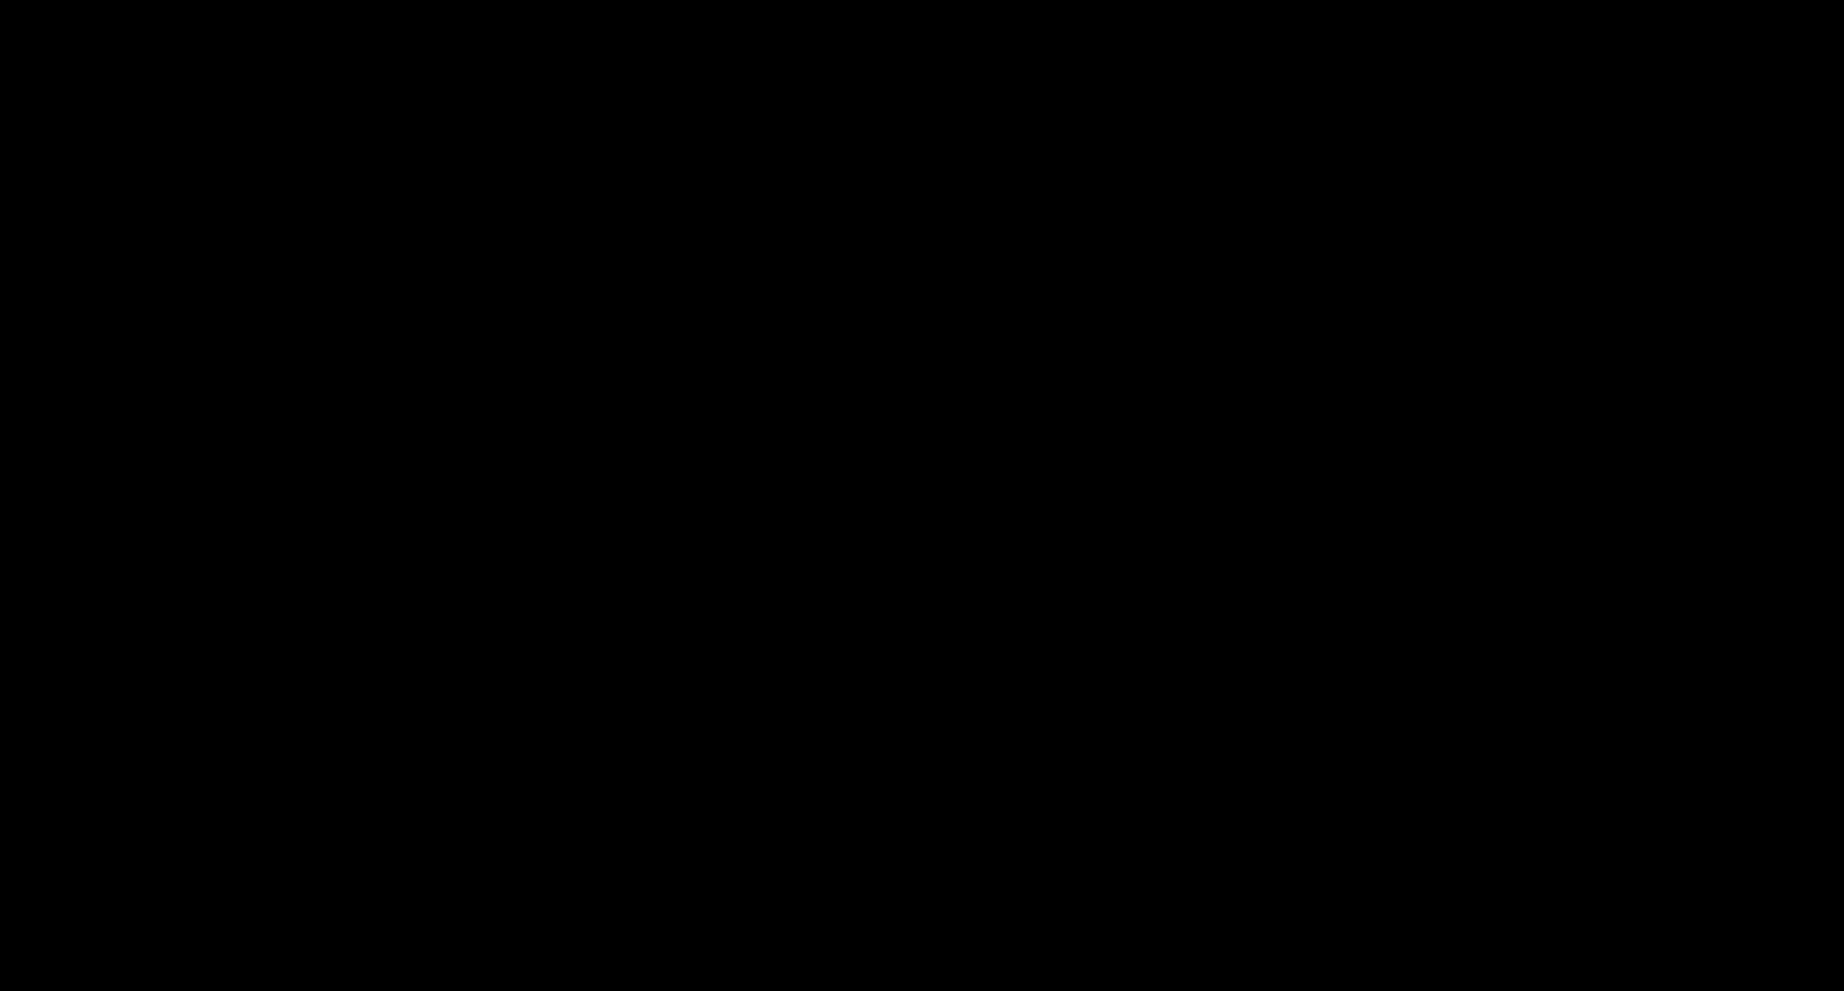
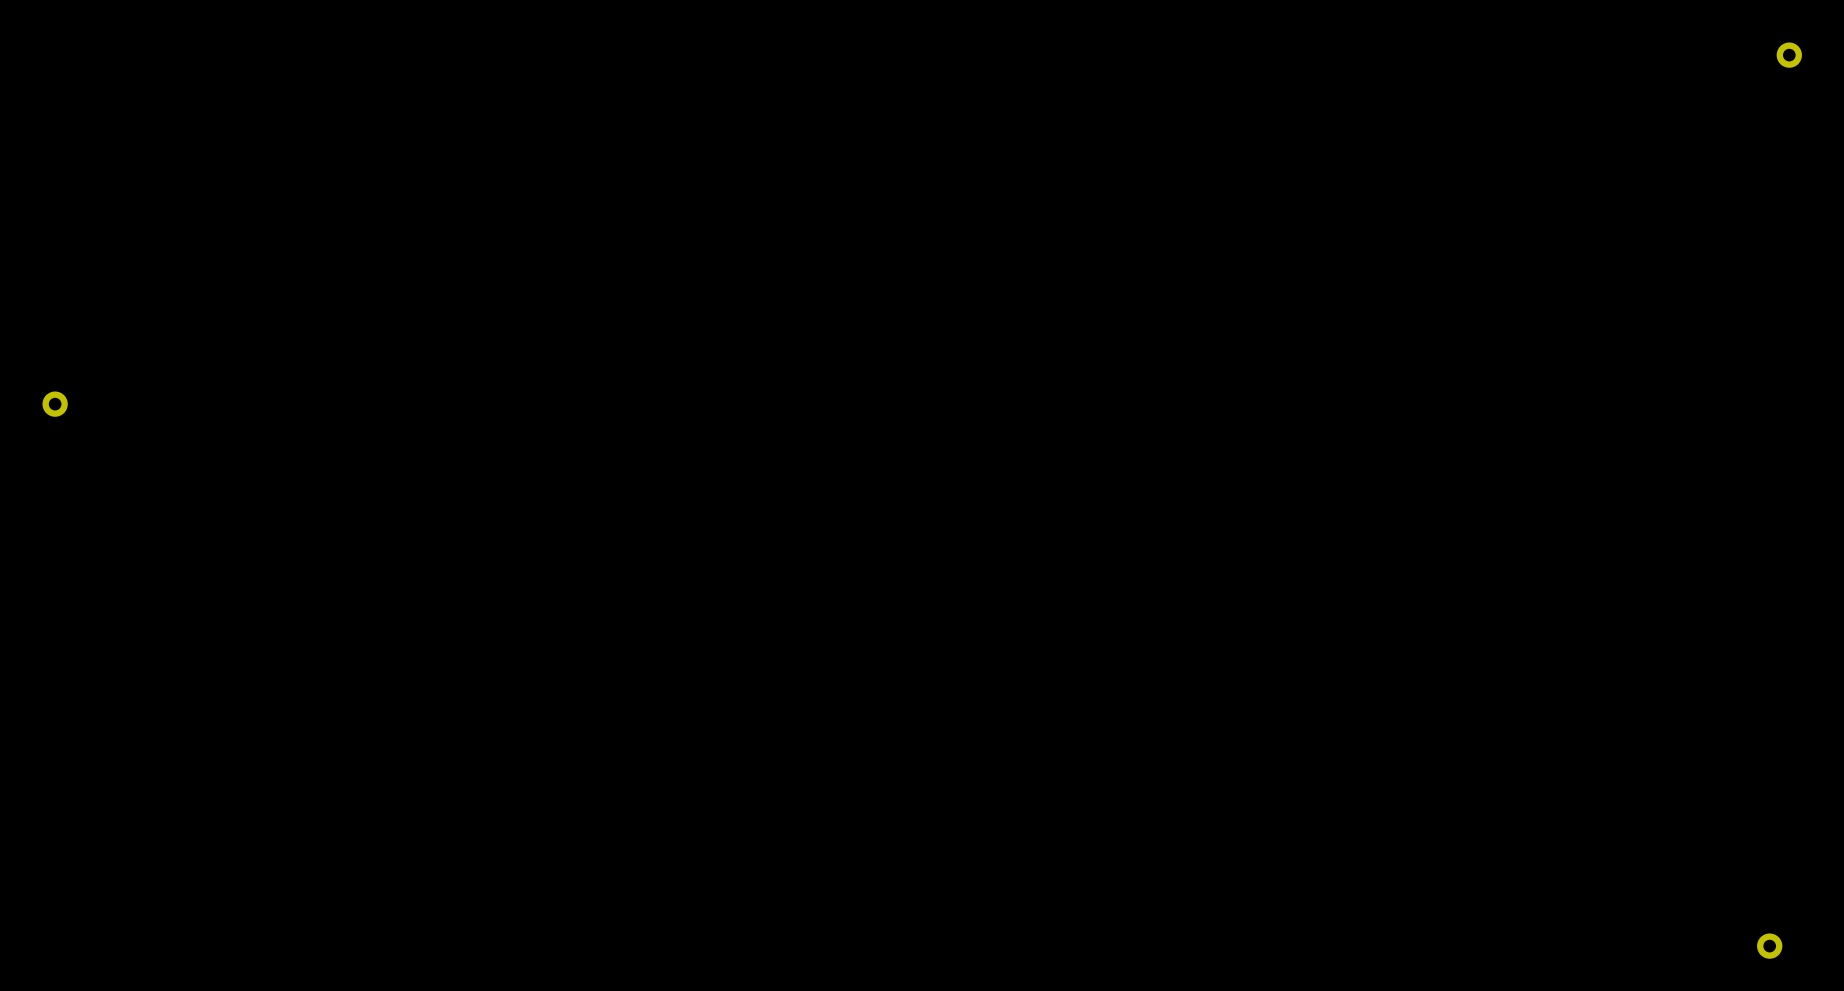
part: none -> (1789, 55)
part: none -> (55, 404)
part: none -> (1769, 946)

